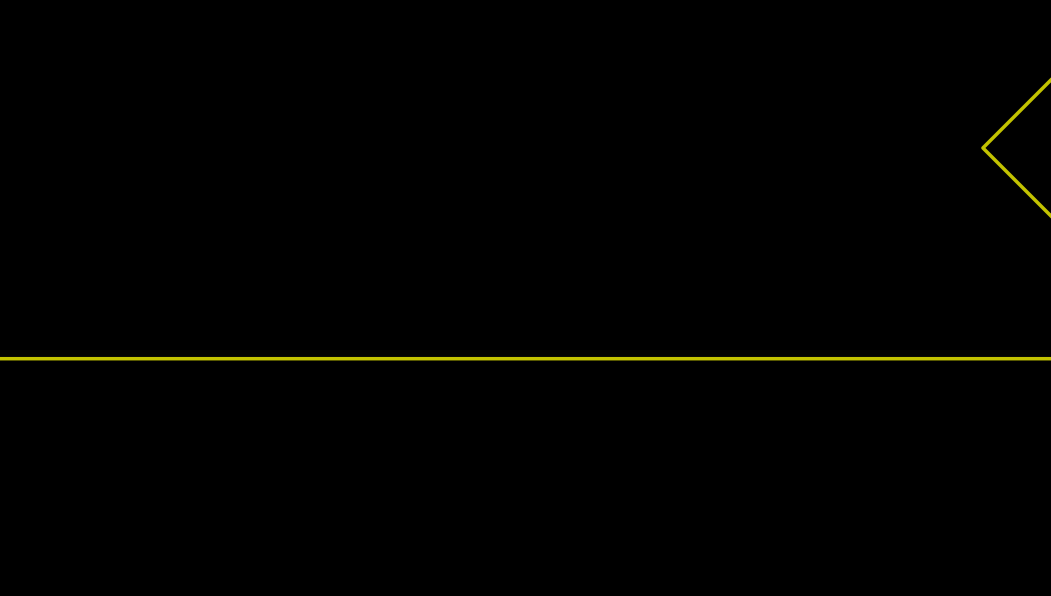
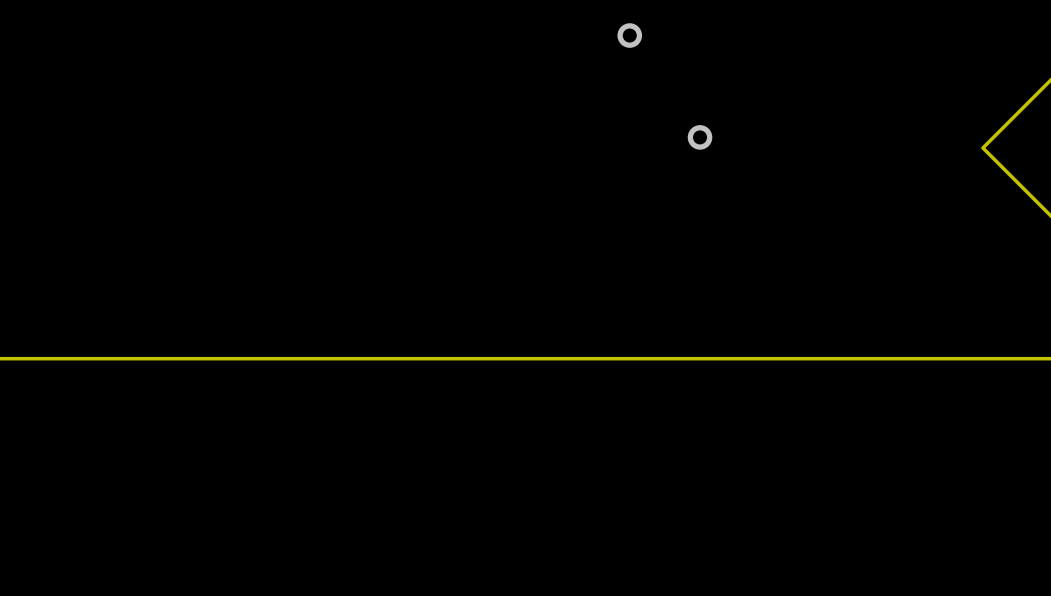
via: none -> (629, 35)
via: none -> (700, 137)

